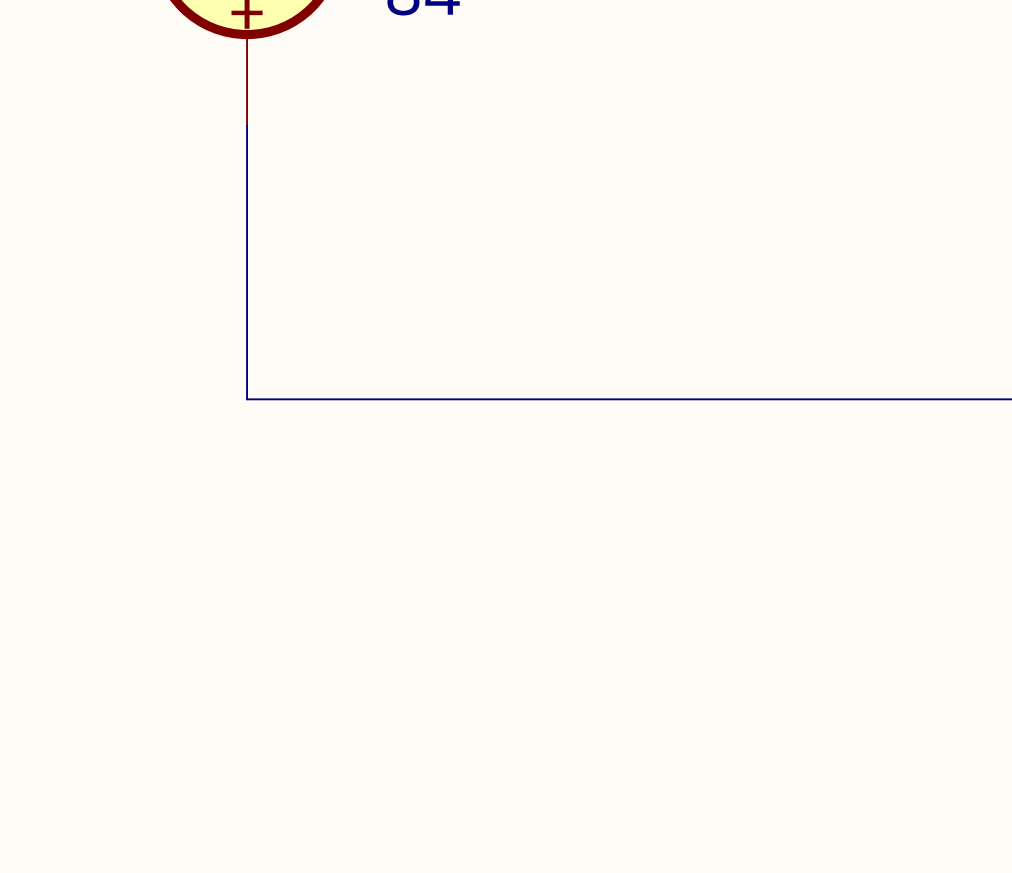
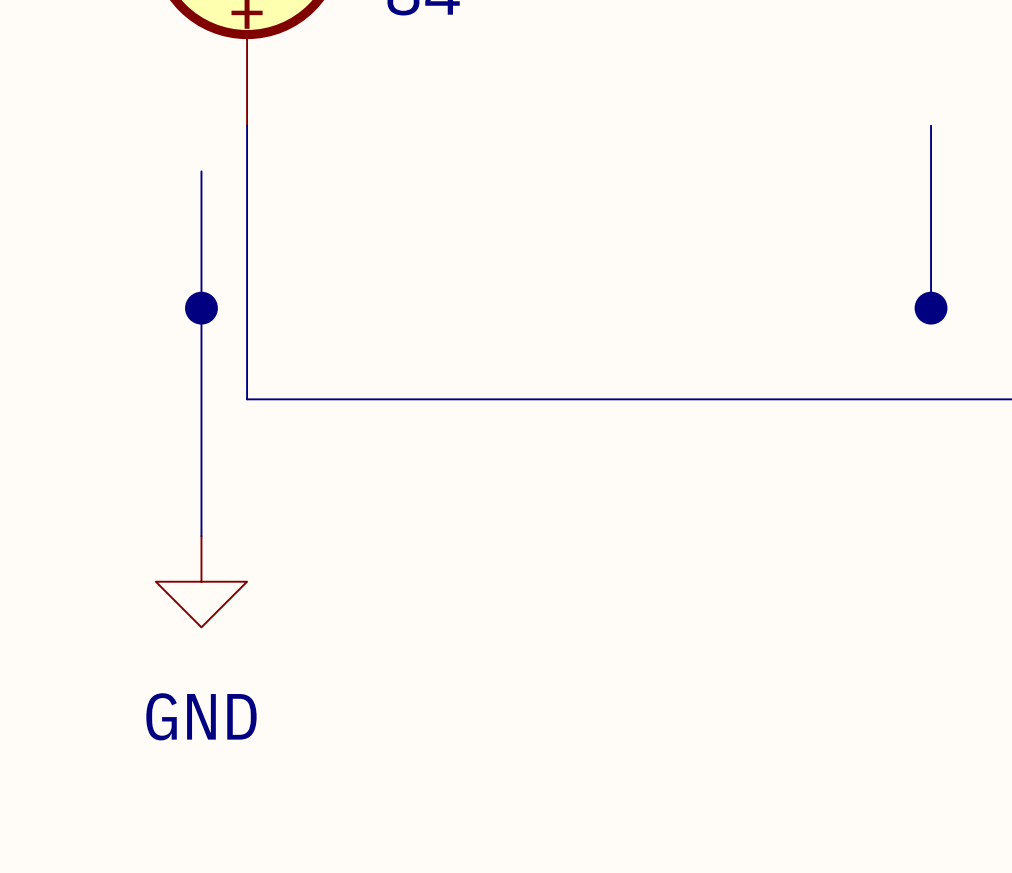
wire: none -> (931, 125) (931, 308)
wire: none -> (201, 171) (201, 536)
junction: none -> (201, 308)
junction: none -> (931, 308)
power symbol: none -> GND (201, 581)

